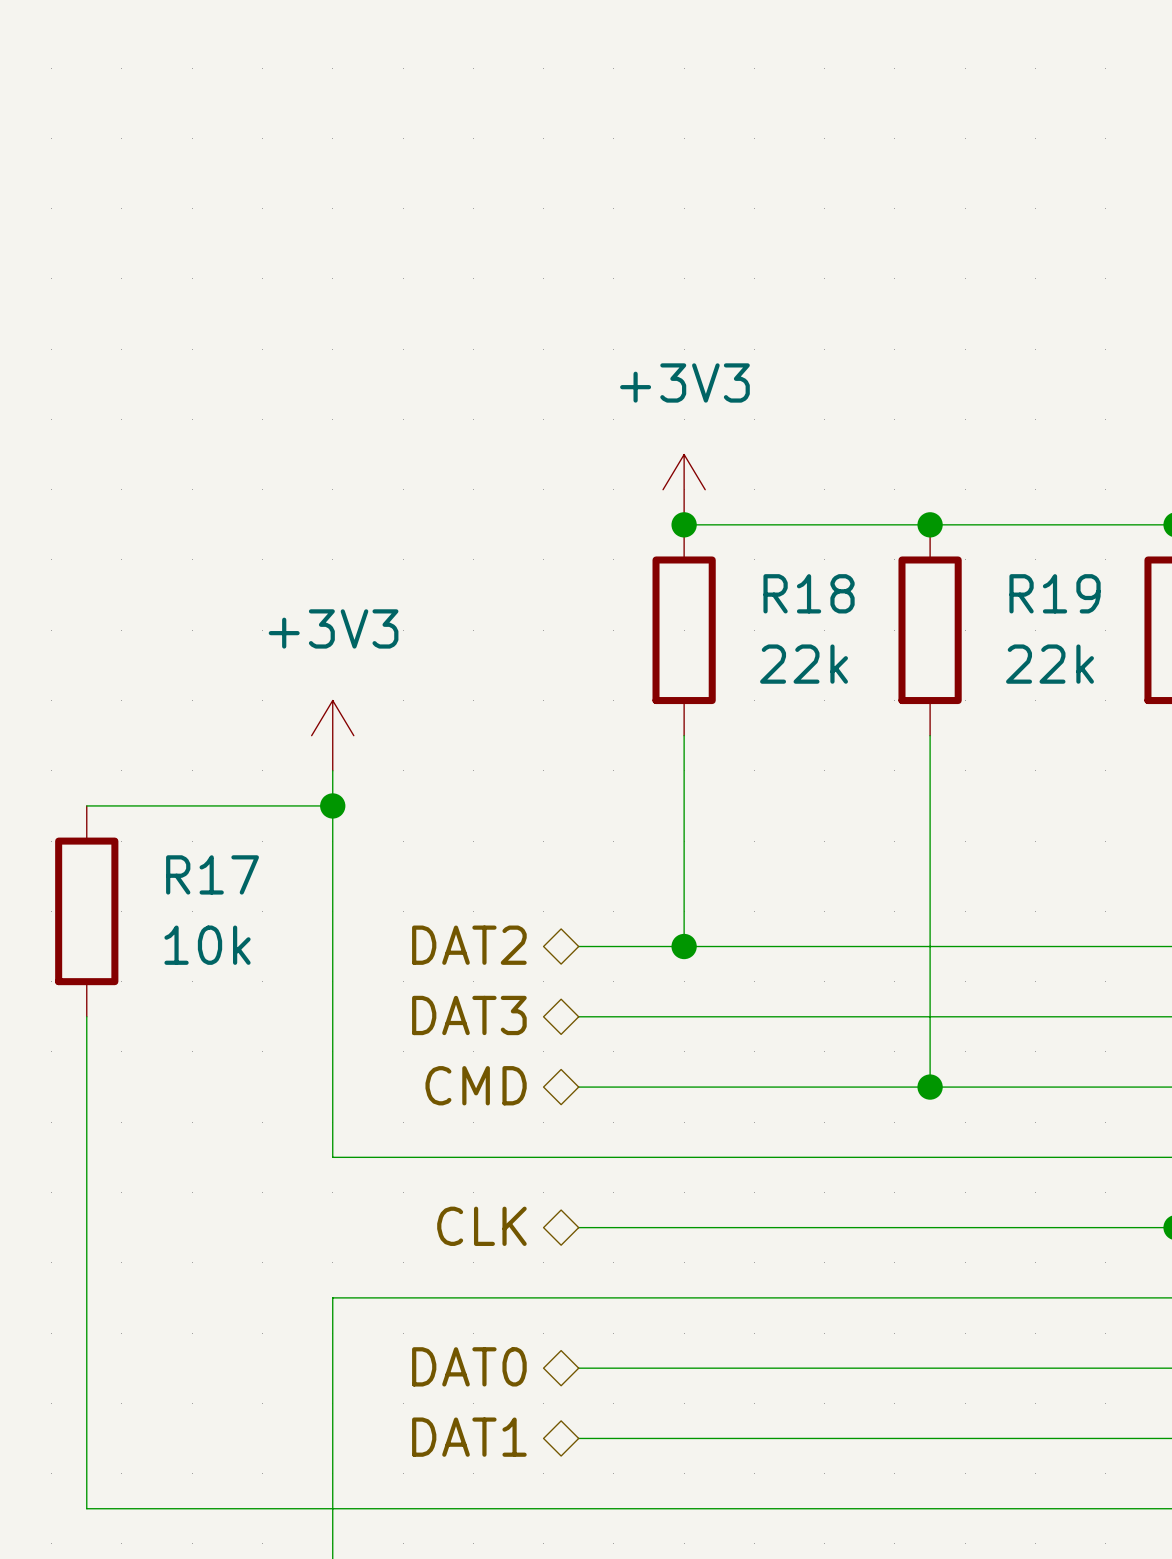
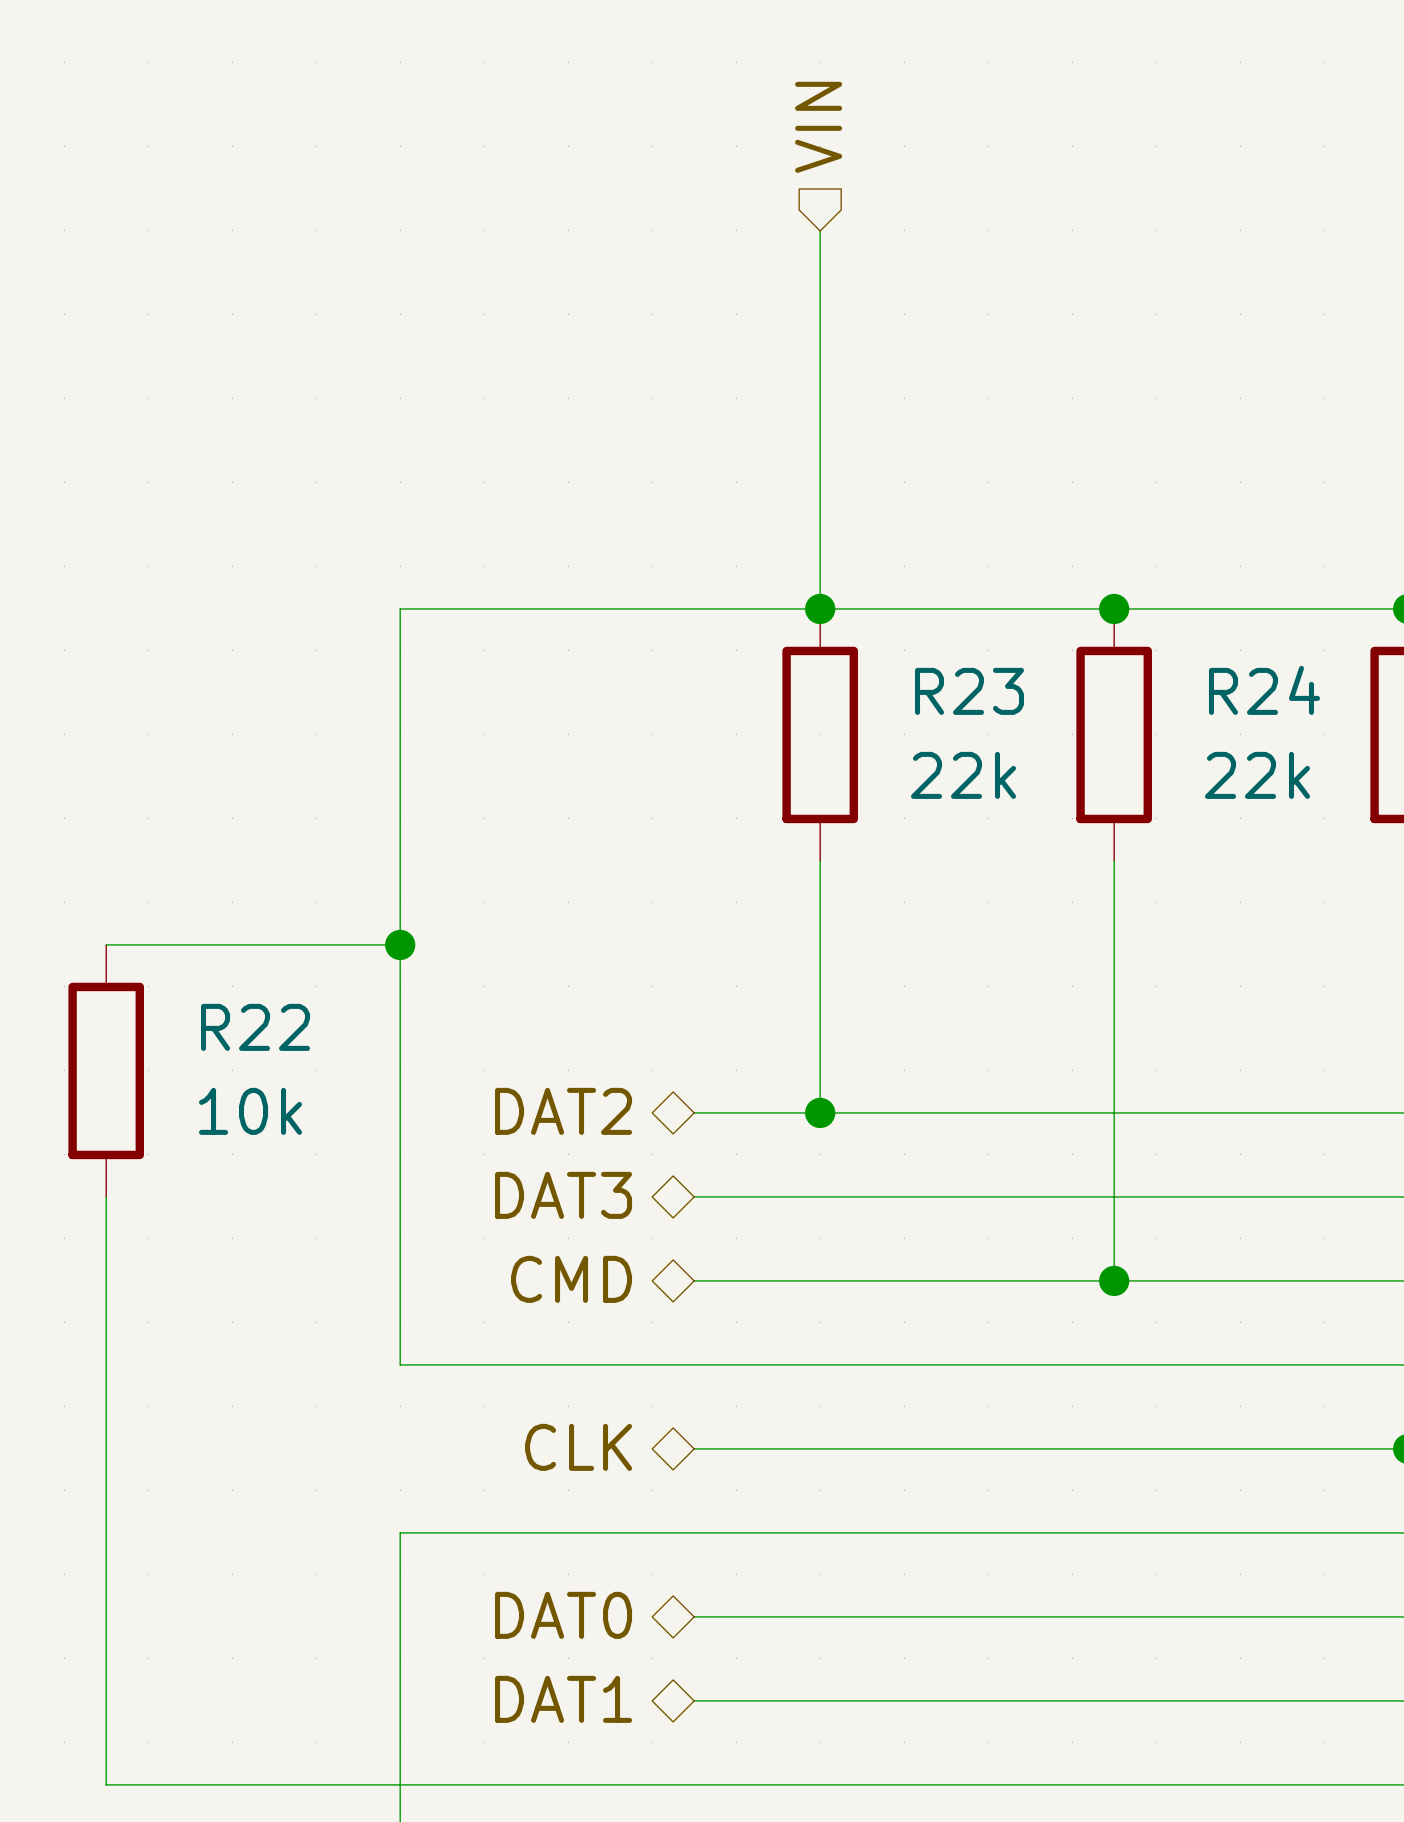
hierarchical label: none -> VIN (818, 127)
wire: none -> (820, 230) (820, 608) (400, 608) (400, 902)
power symbol: +3V3 (684, 489) -> none
R18 name: R18 (809, 593) -> R23 (969, 691)
R19 name: R19 (1055, 593) -> R24 (1264, 690)
power symbol: +3V3 (332, 735) -> none
R17 name: R17 (212, 874) -> R22 (255, 1027)

